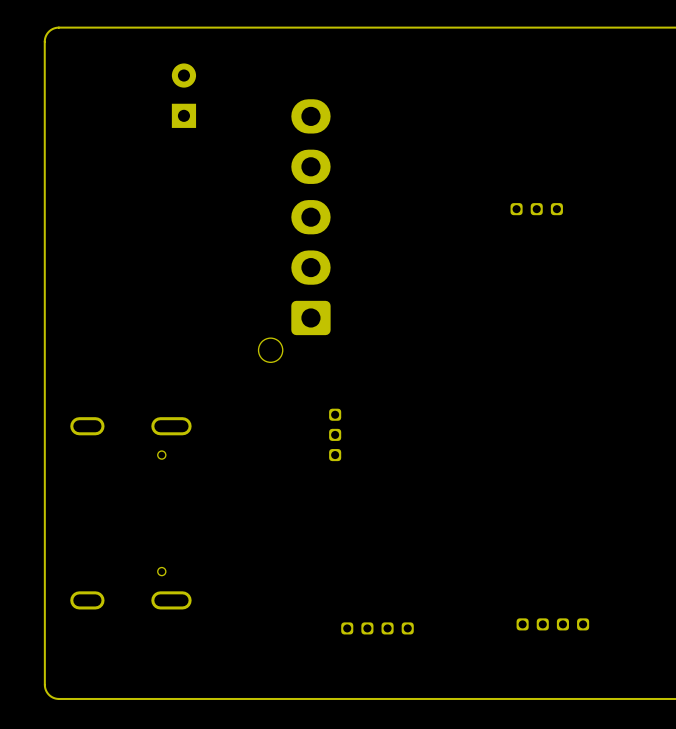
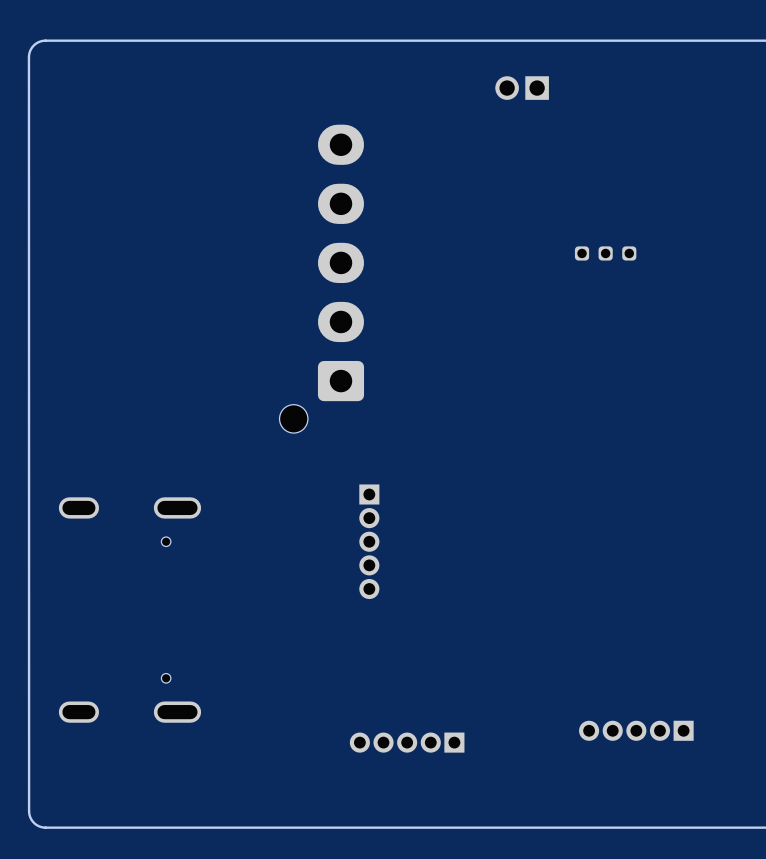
part: none -> (522, 88)
part: (183, 95) -> none
part footprint: [329, 408, 342, 462] -> [359, 484, 380, 600]
part footprint: [516, 618, 590, 631] -> [579, 720, 694, 741]
part footprint: [341, 622, 414, 635] -> [349, 732, 465, 753]

